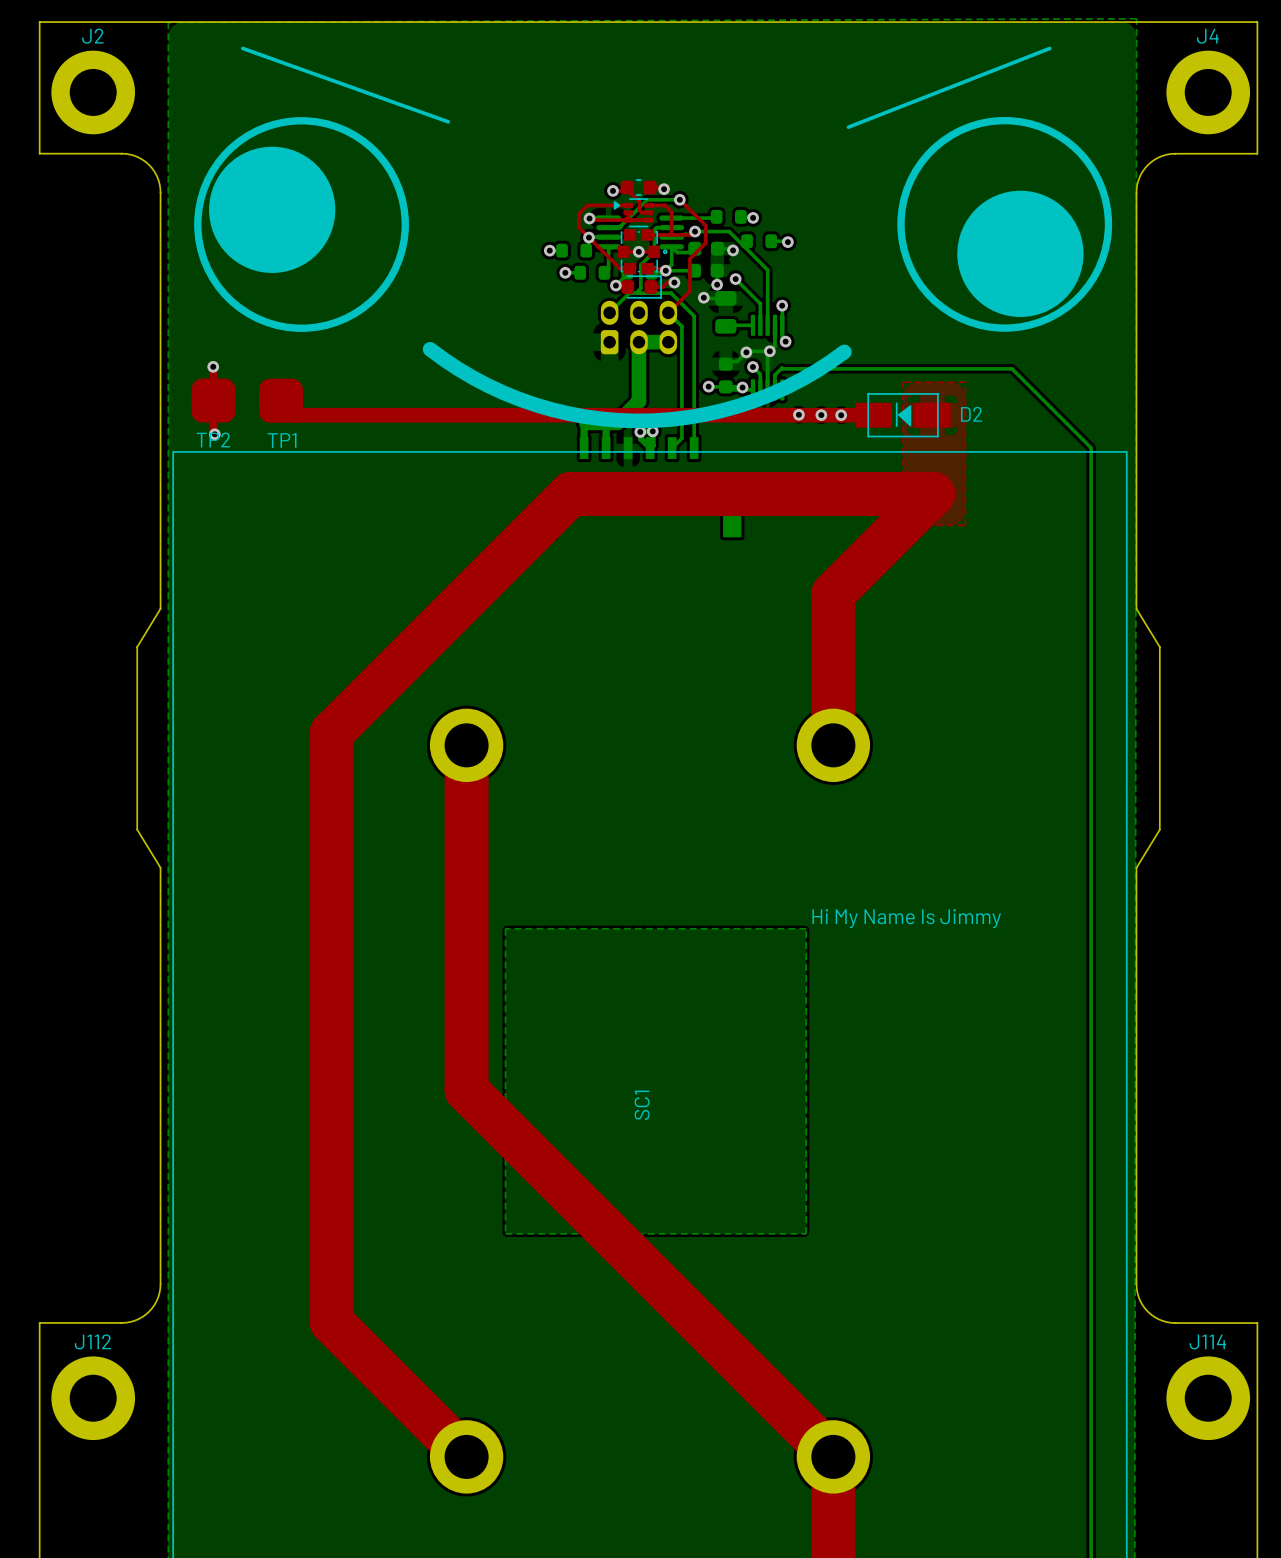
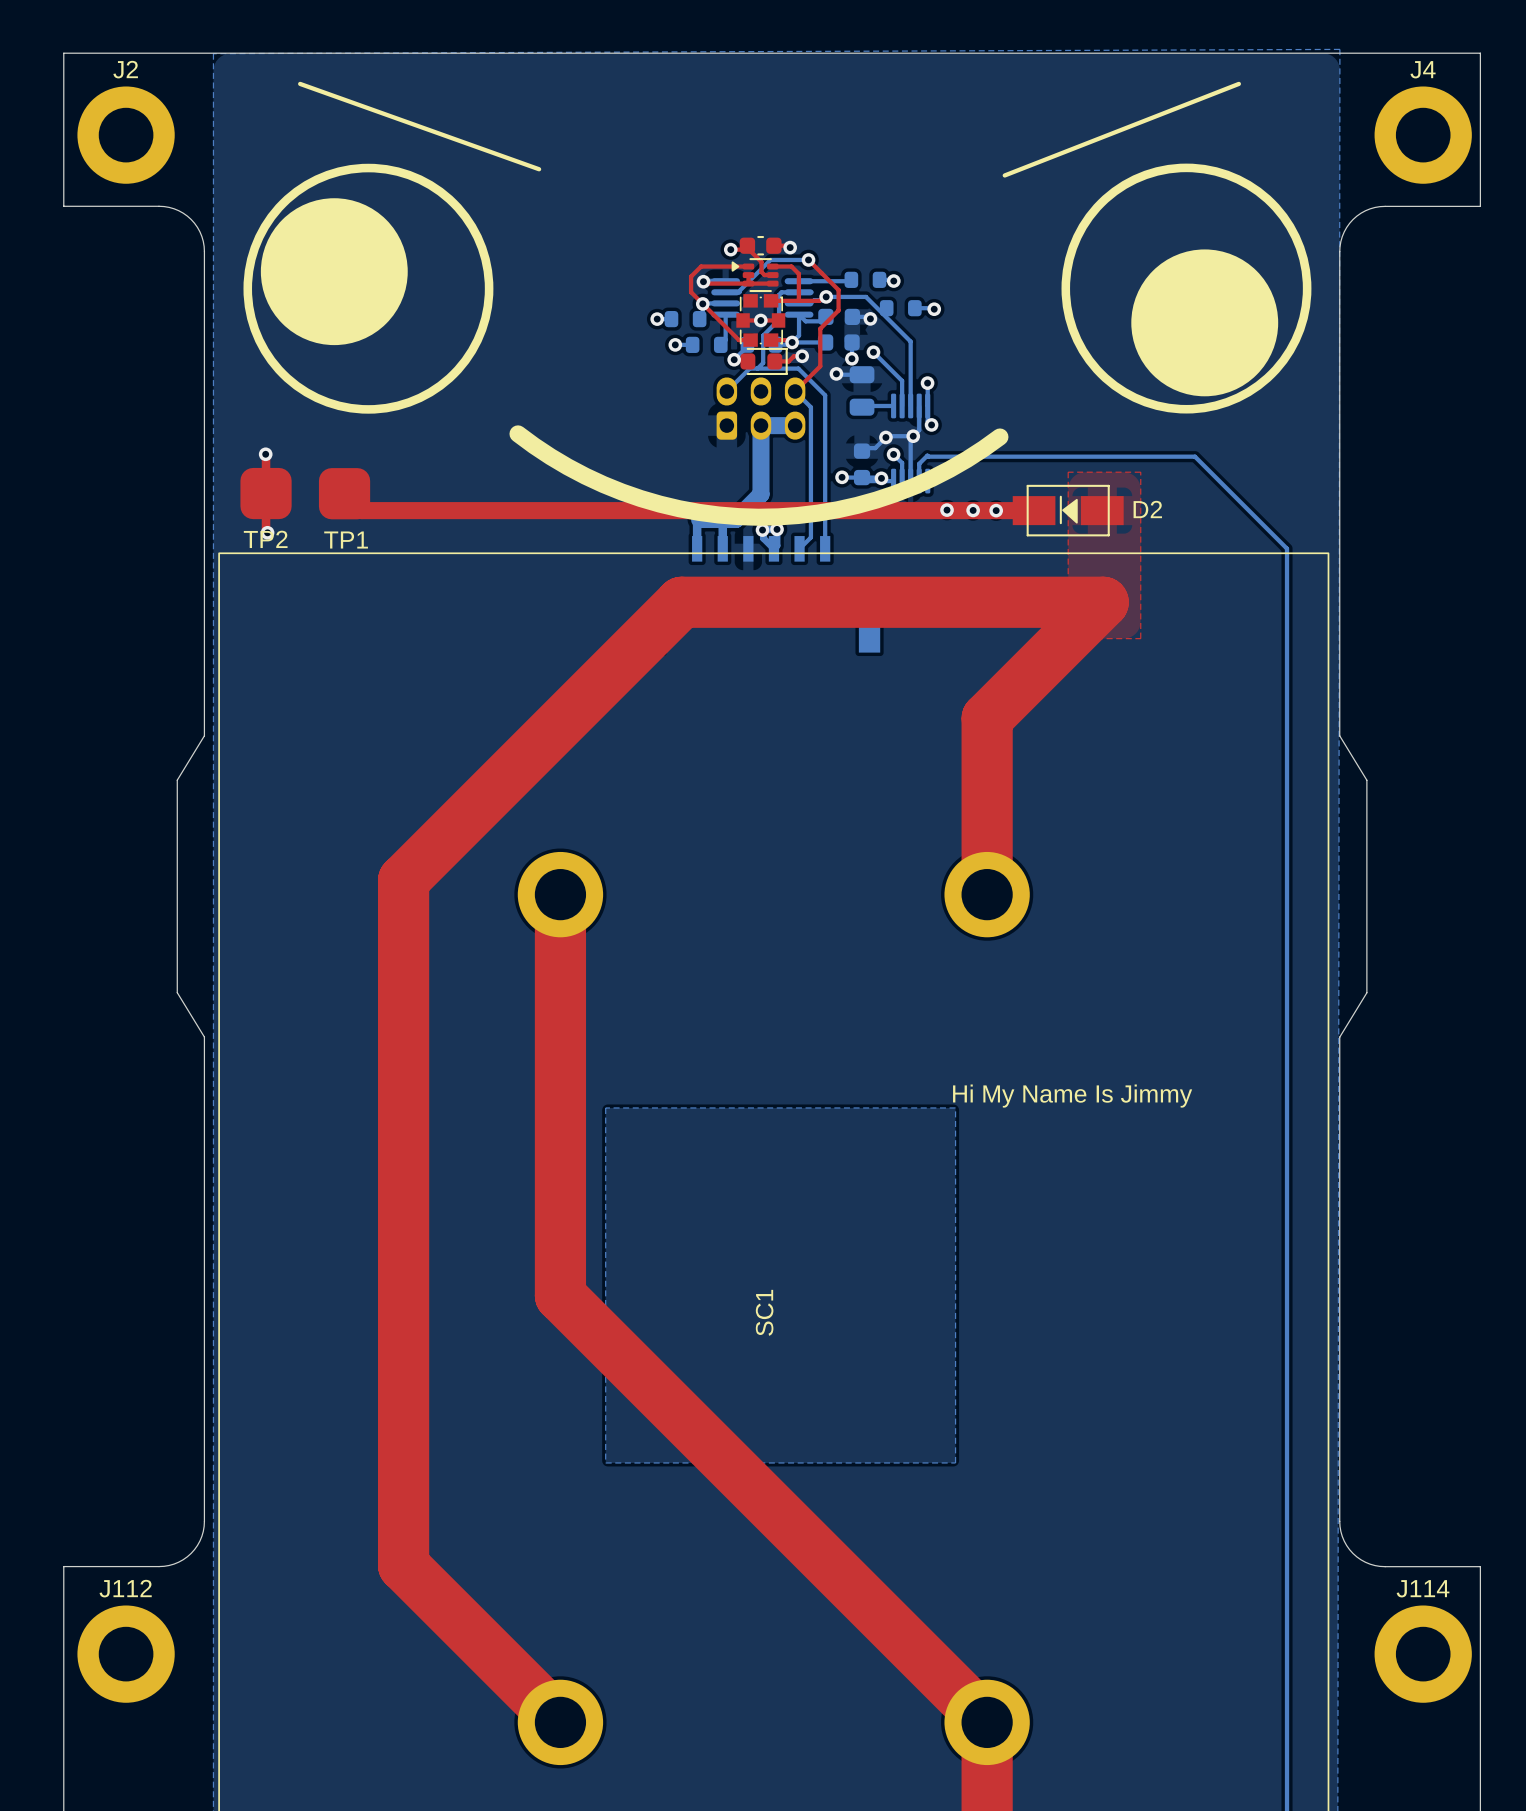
part footprint: [617, 229, 668, 275] -> [736, 294, 786, 347]

